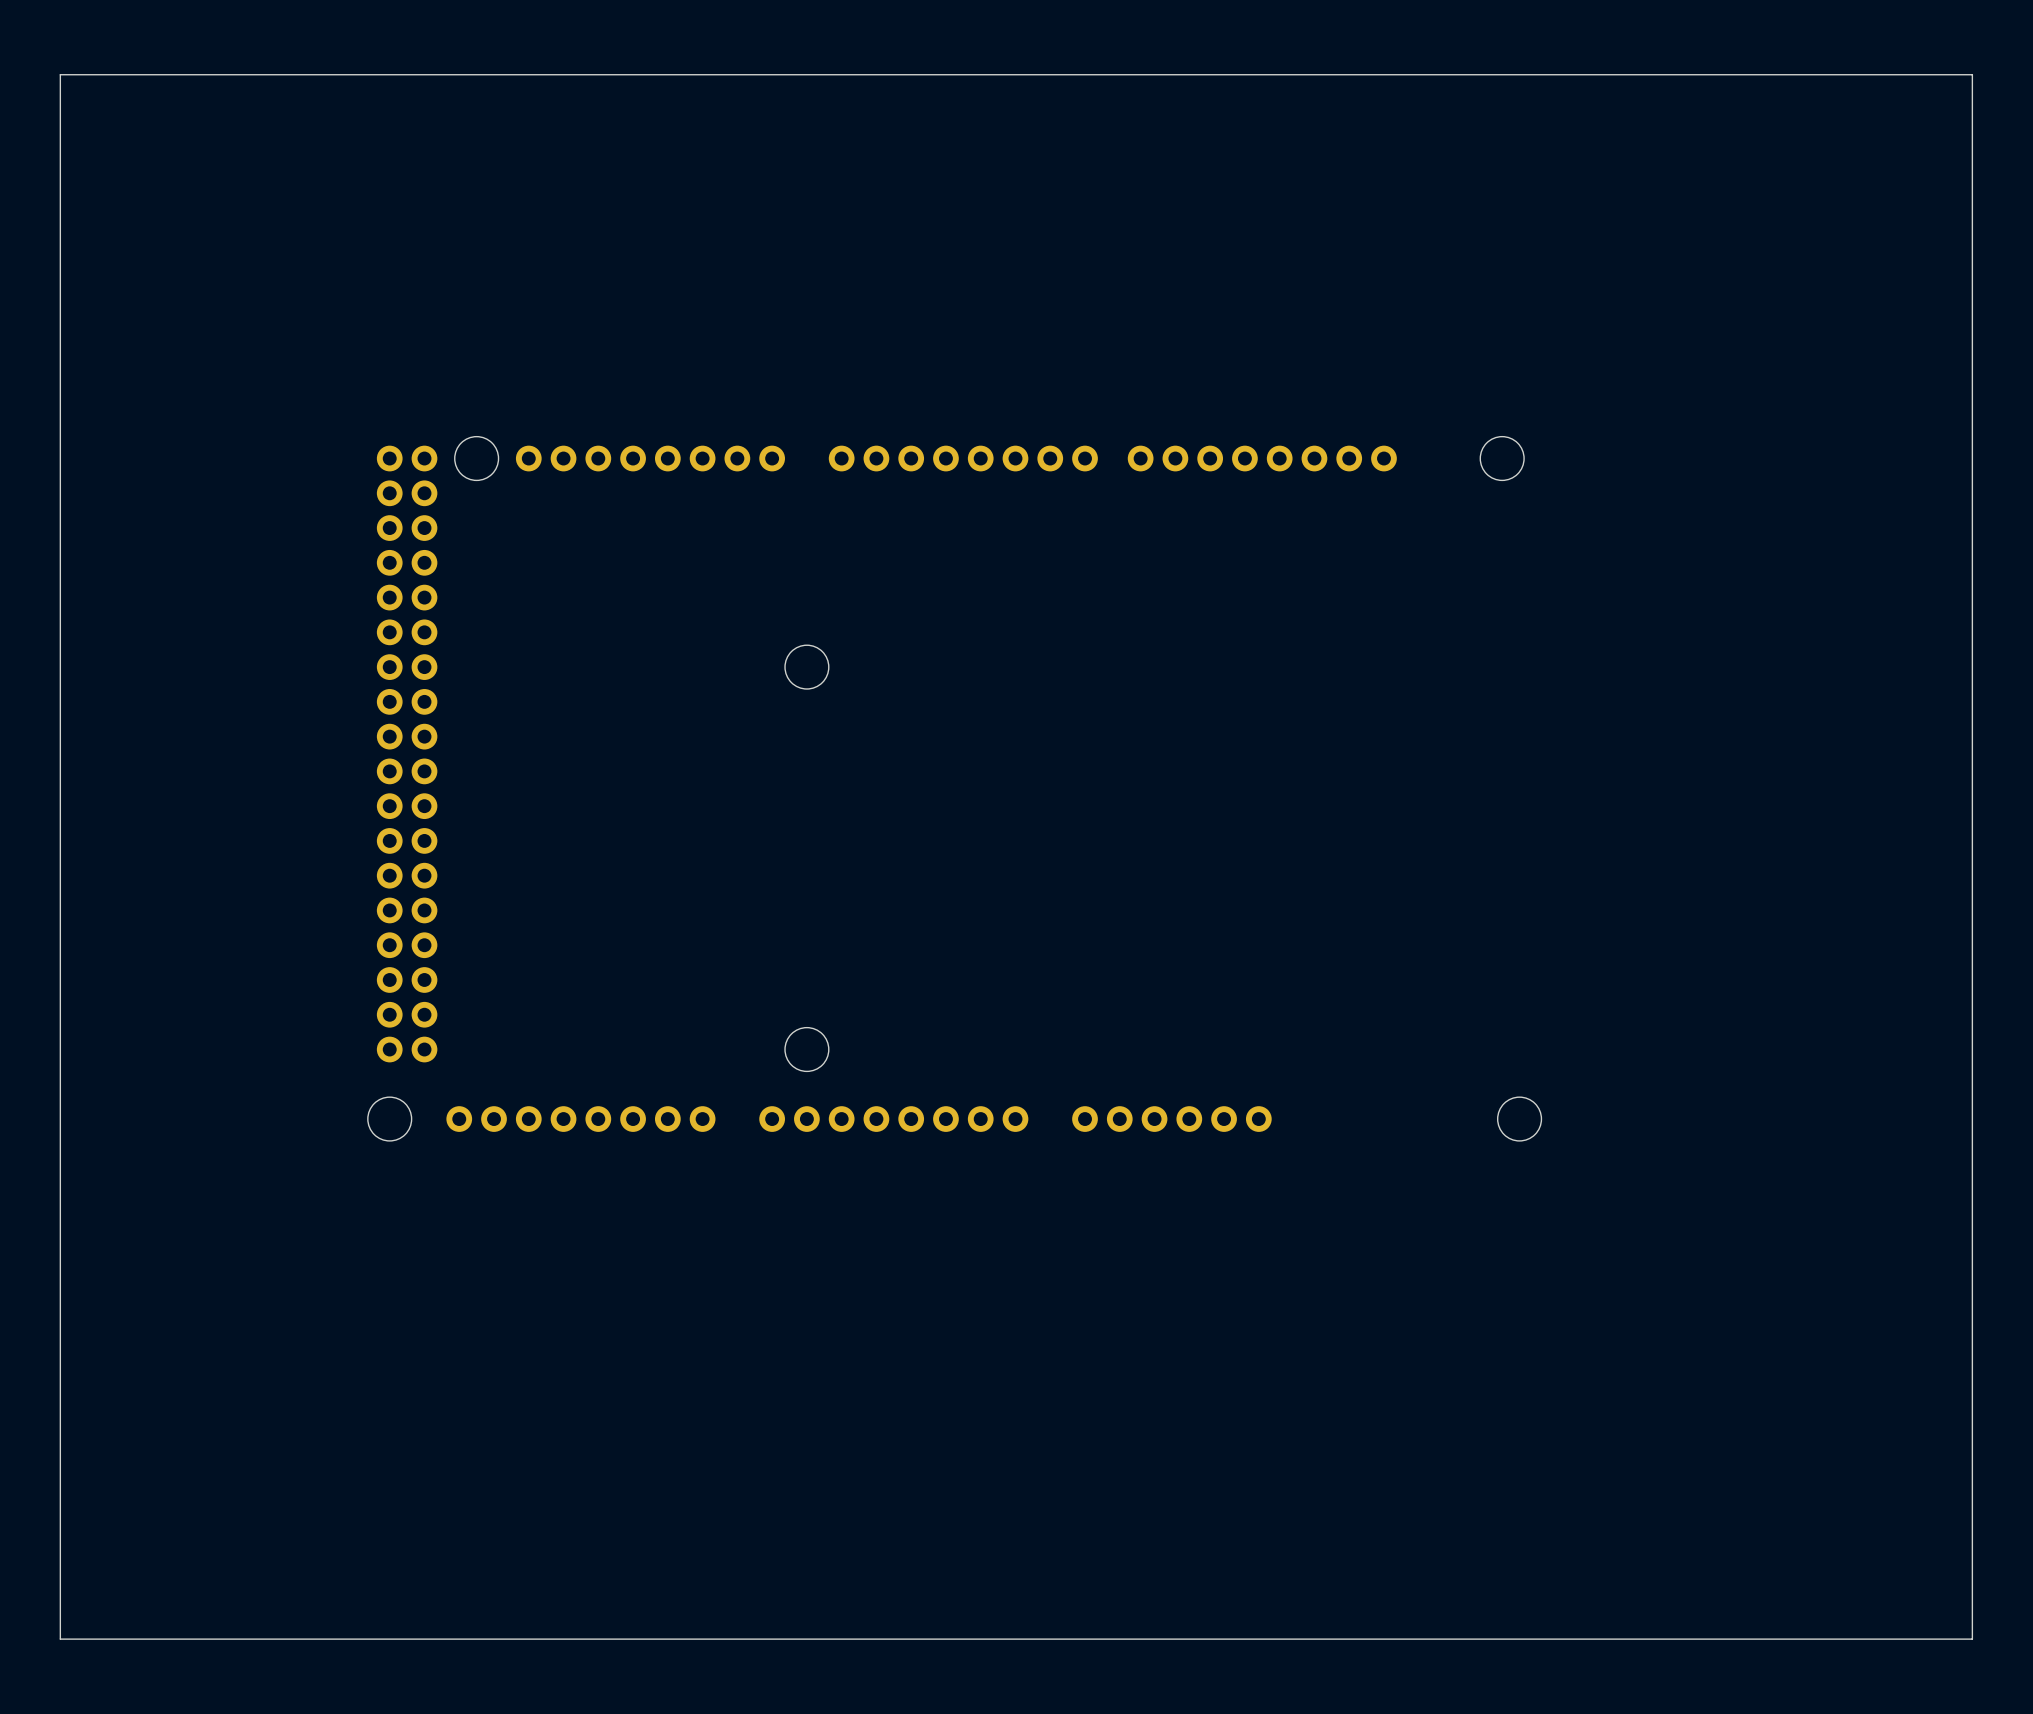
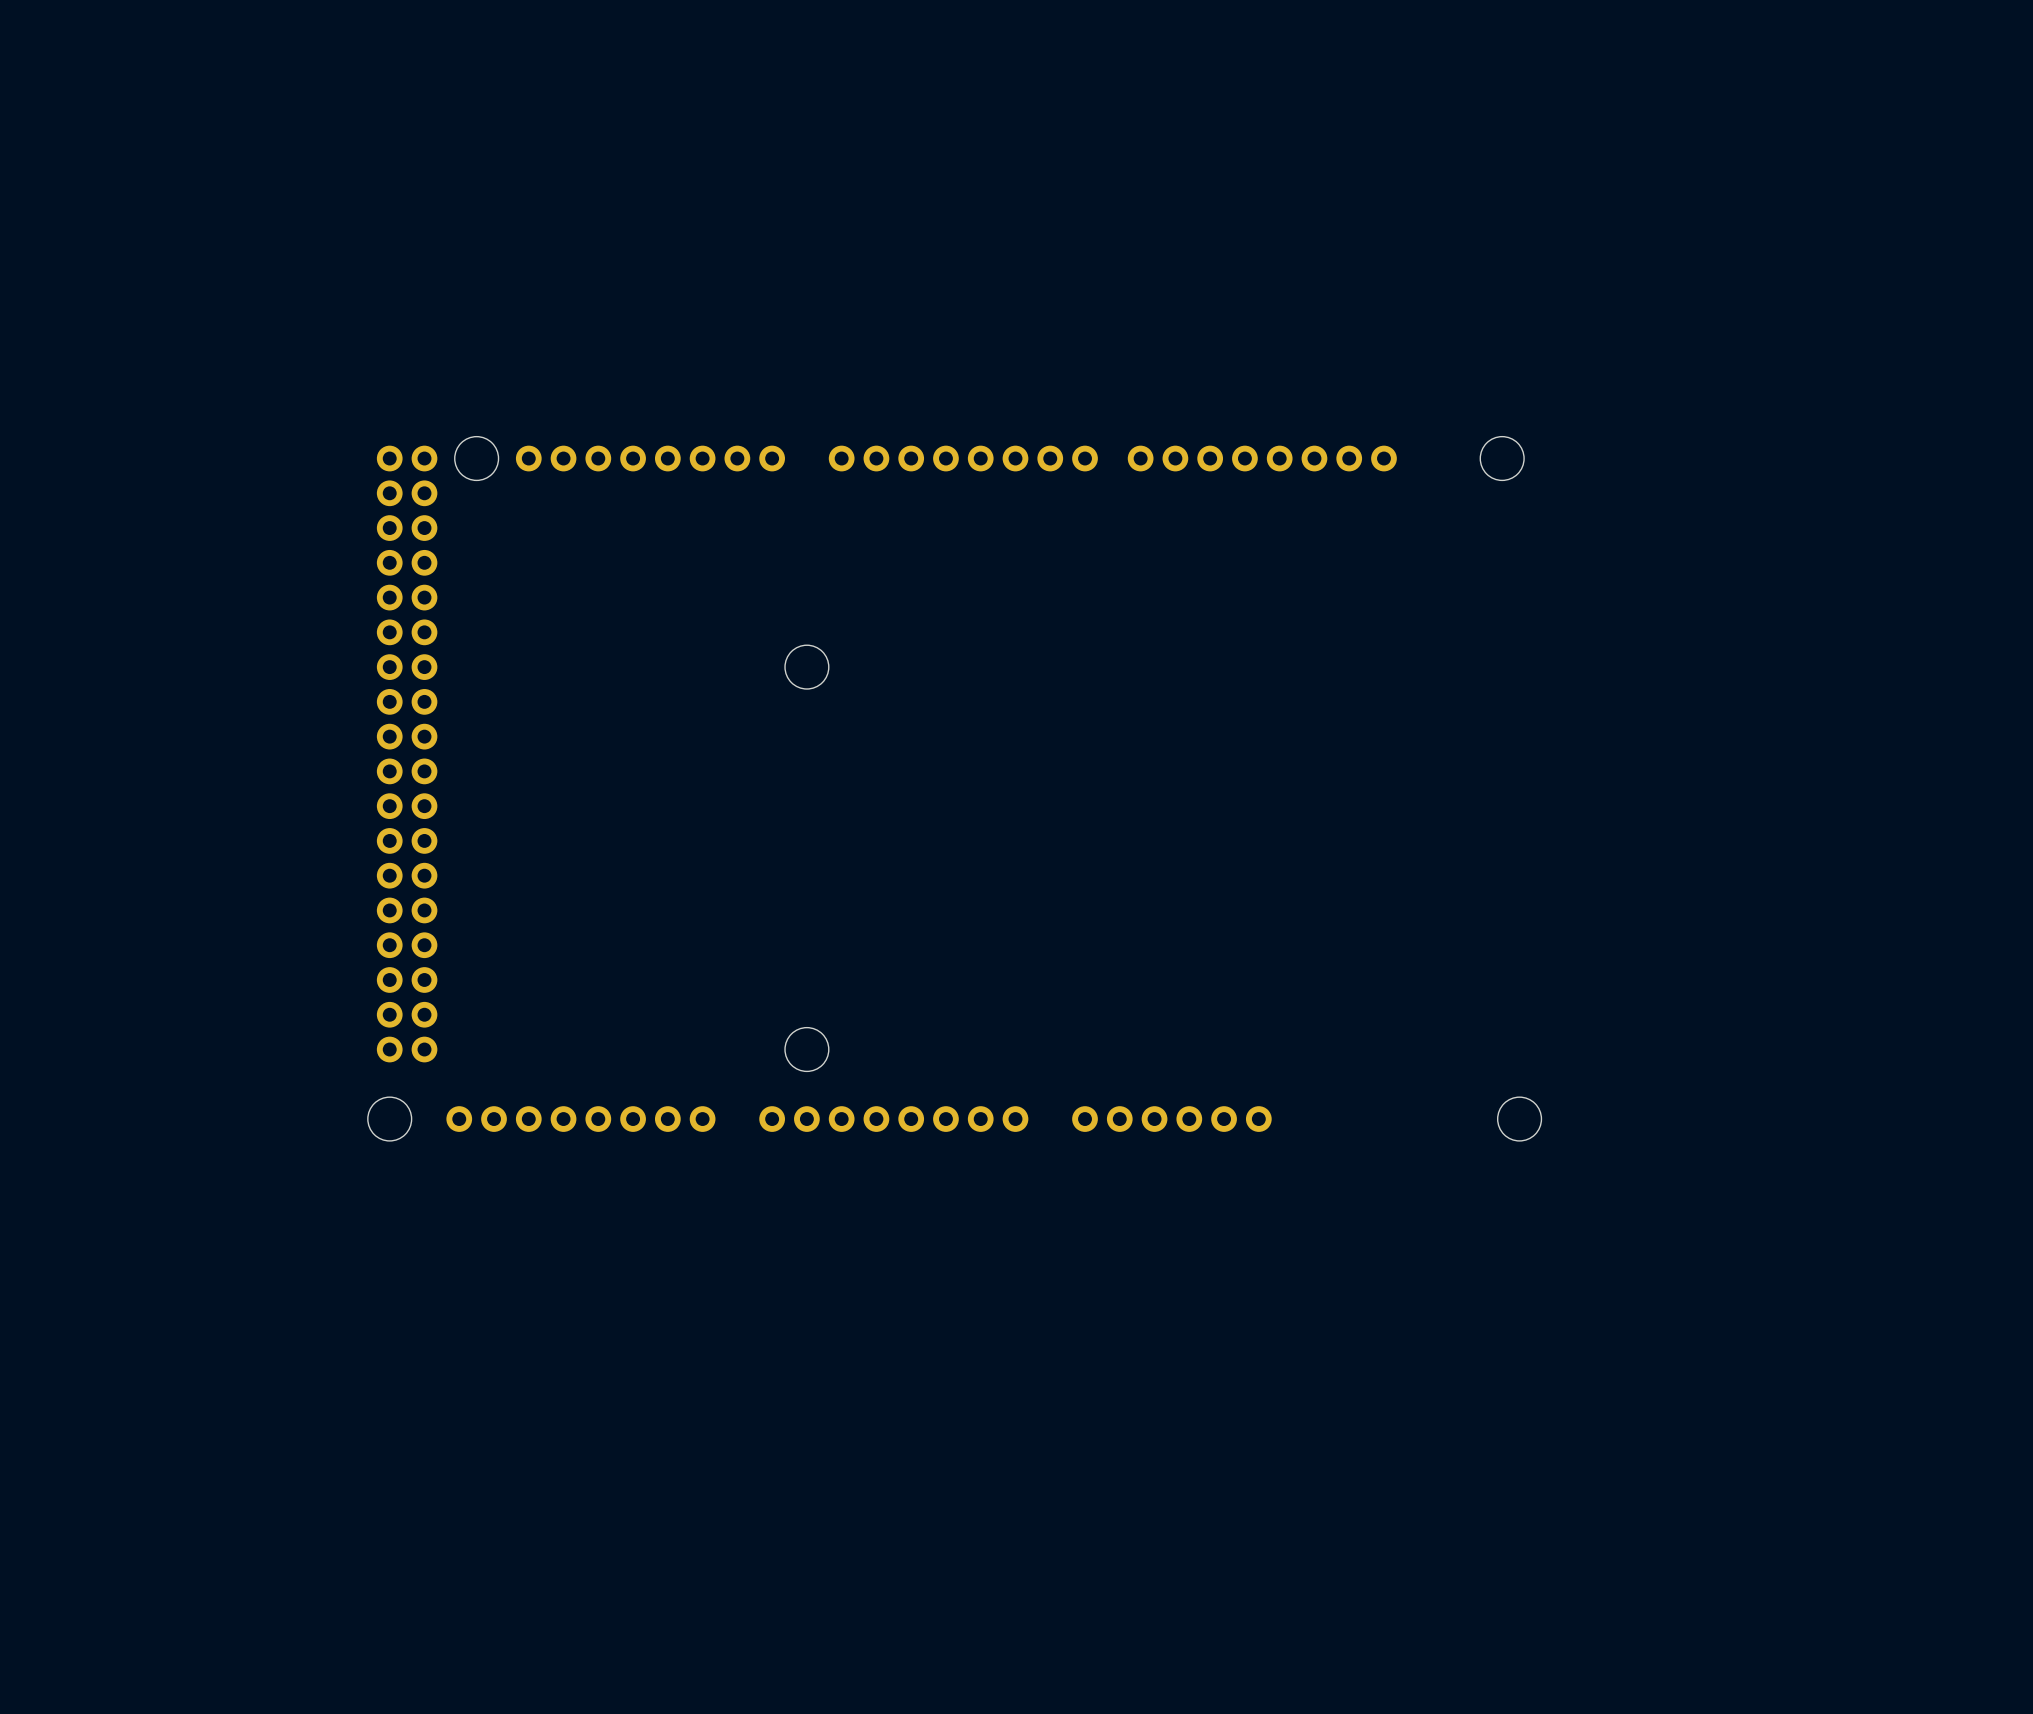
board edge: (1972, 74) (1972, 1639) (60, 1639) (60, 74) (1972, 74) -> none

